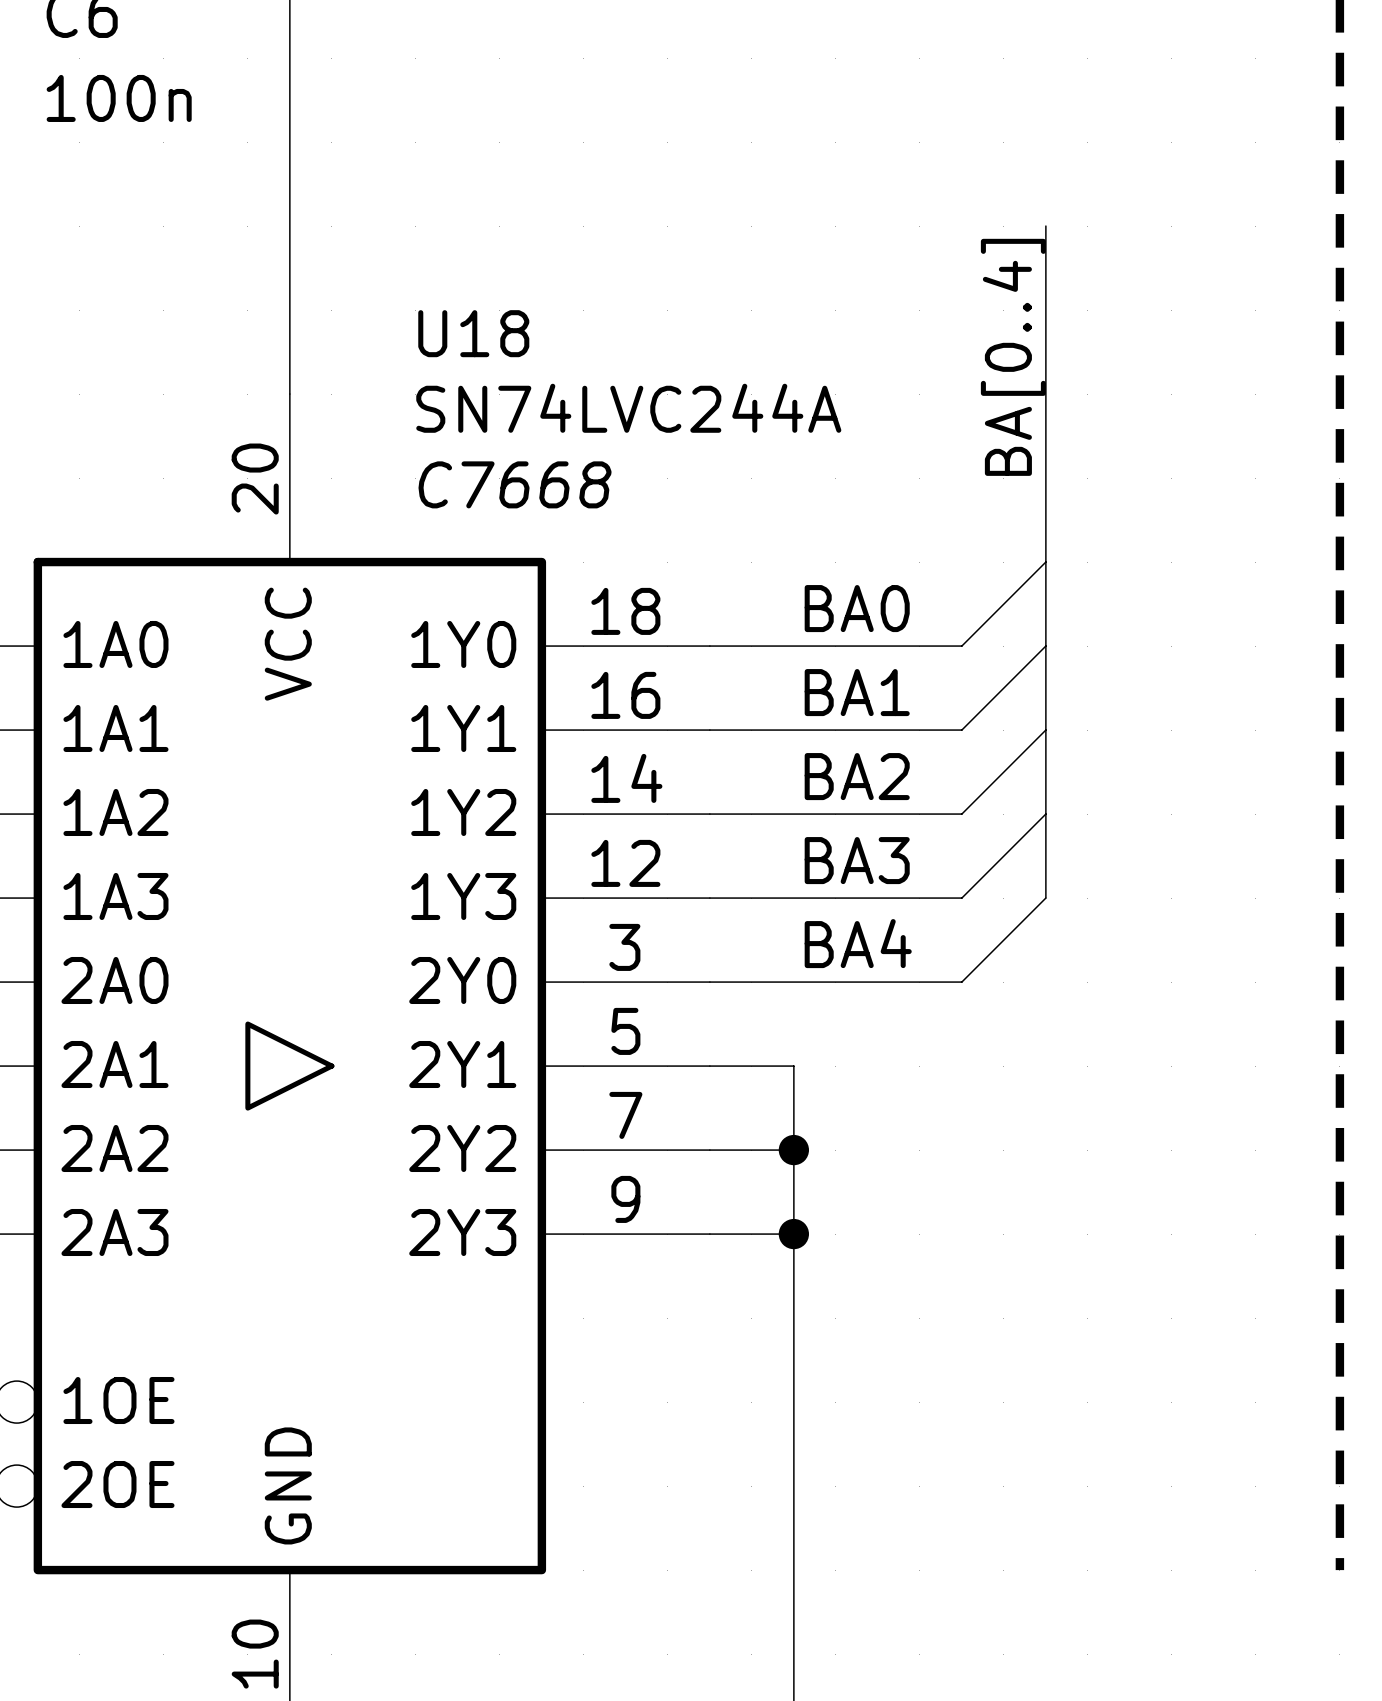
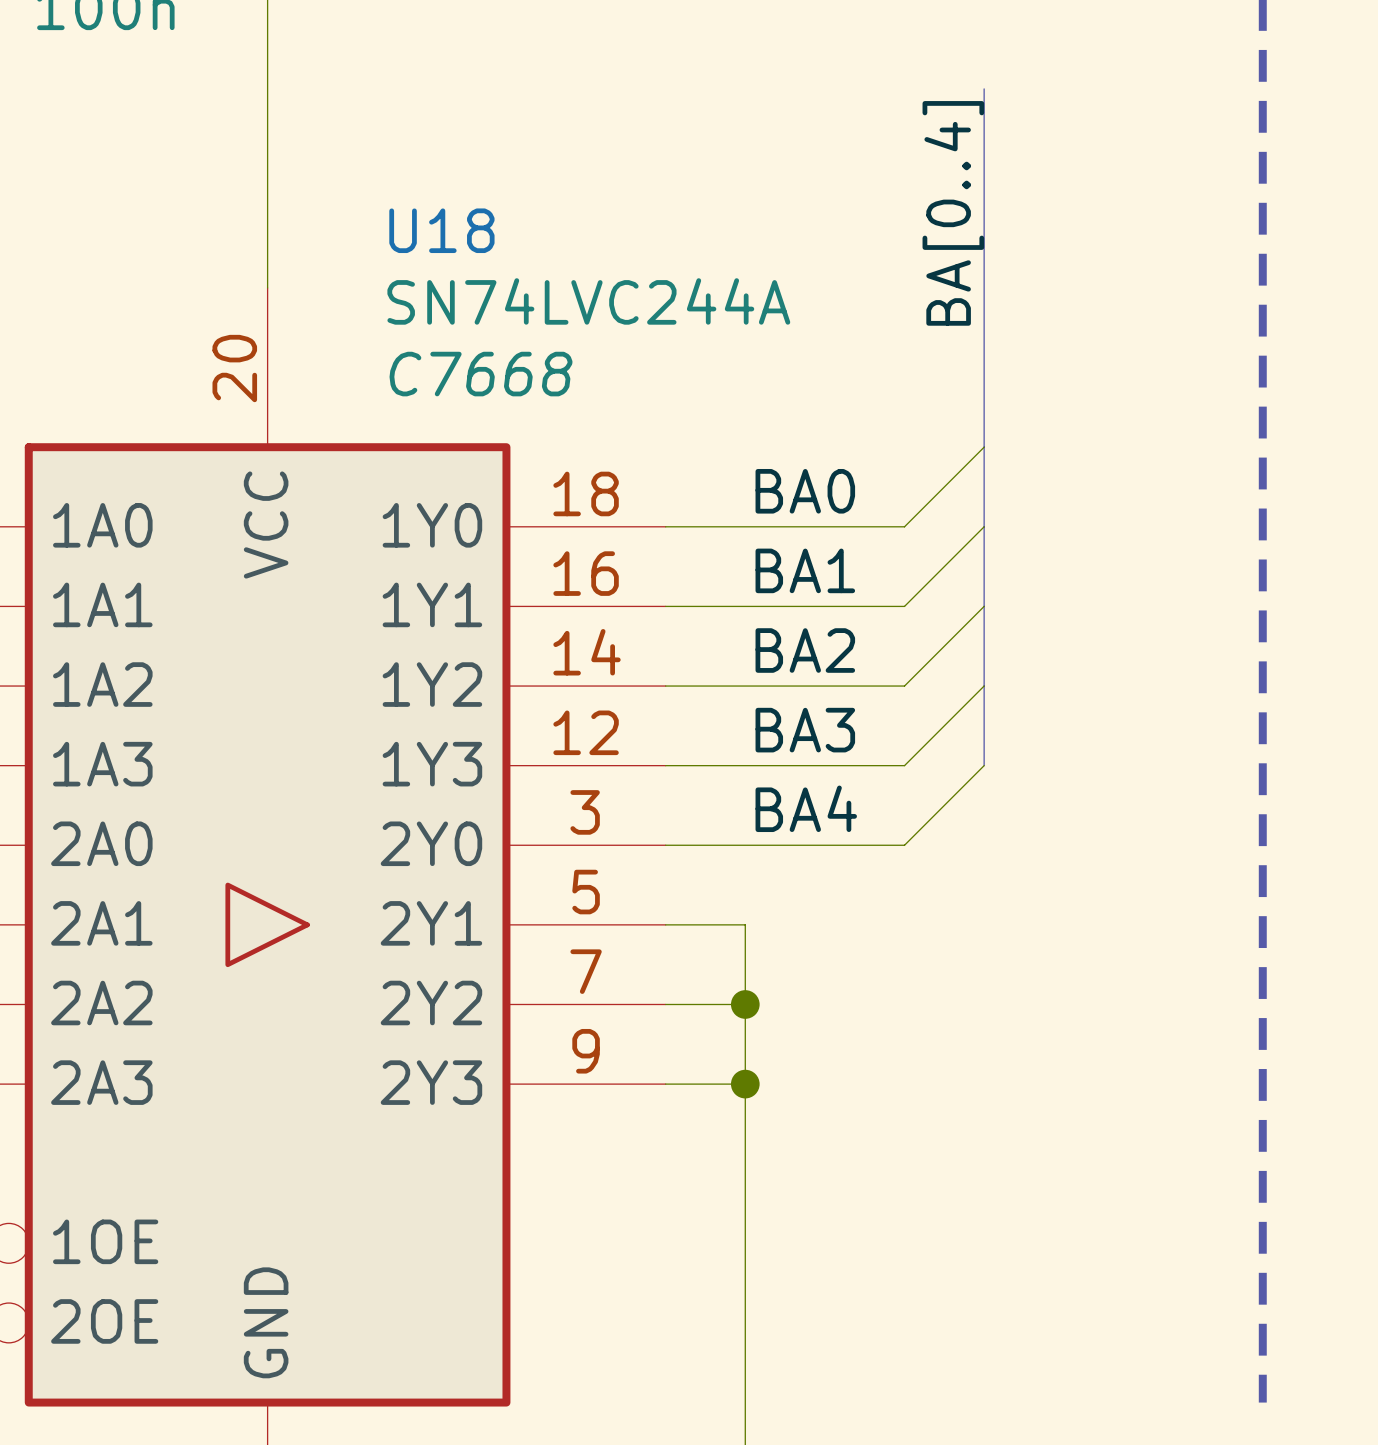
bus: none -> (984, 88) (984, 128)
label position: BA[0..4] (1013, 357) -> BA[0..4] (953, 213)

